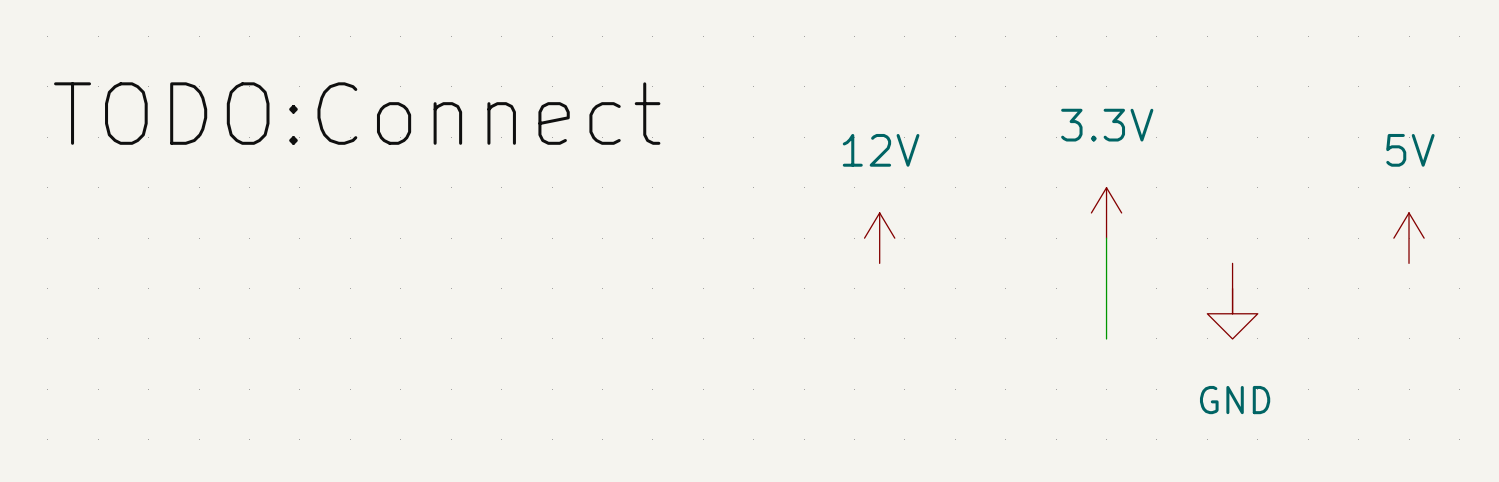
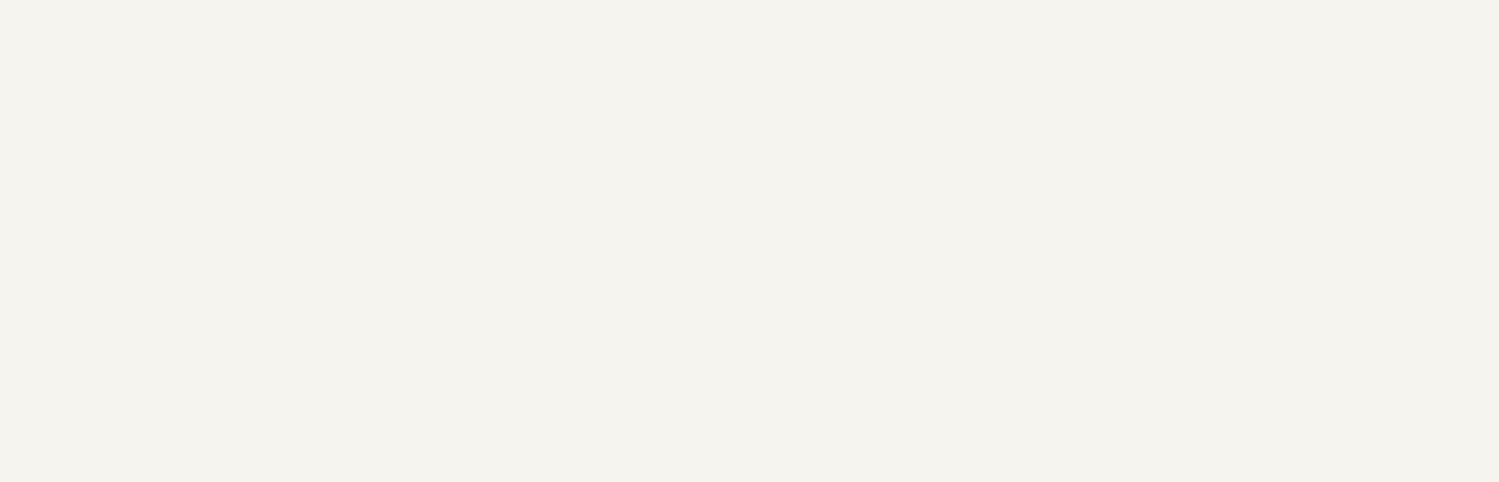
label: TODO:Connect (357, 113) -> none
power symbol: 3.3V (1106, 212) -> none
power symbol: 12V (879, 238) -> none
wire: (1106, 238) (1106, 338) -> none
power symbol: 5V (1409, 238) -> none
power symbol: GND (1232, 301) -> none

